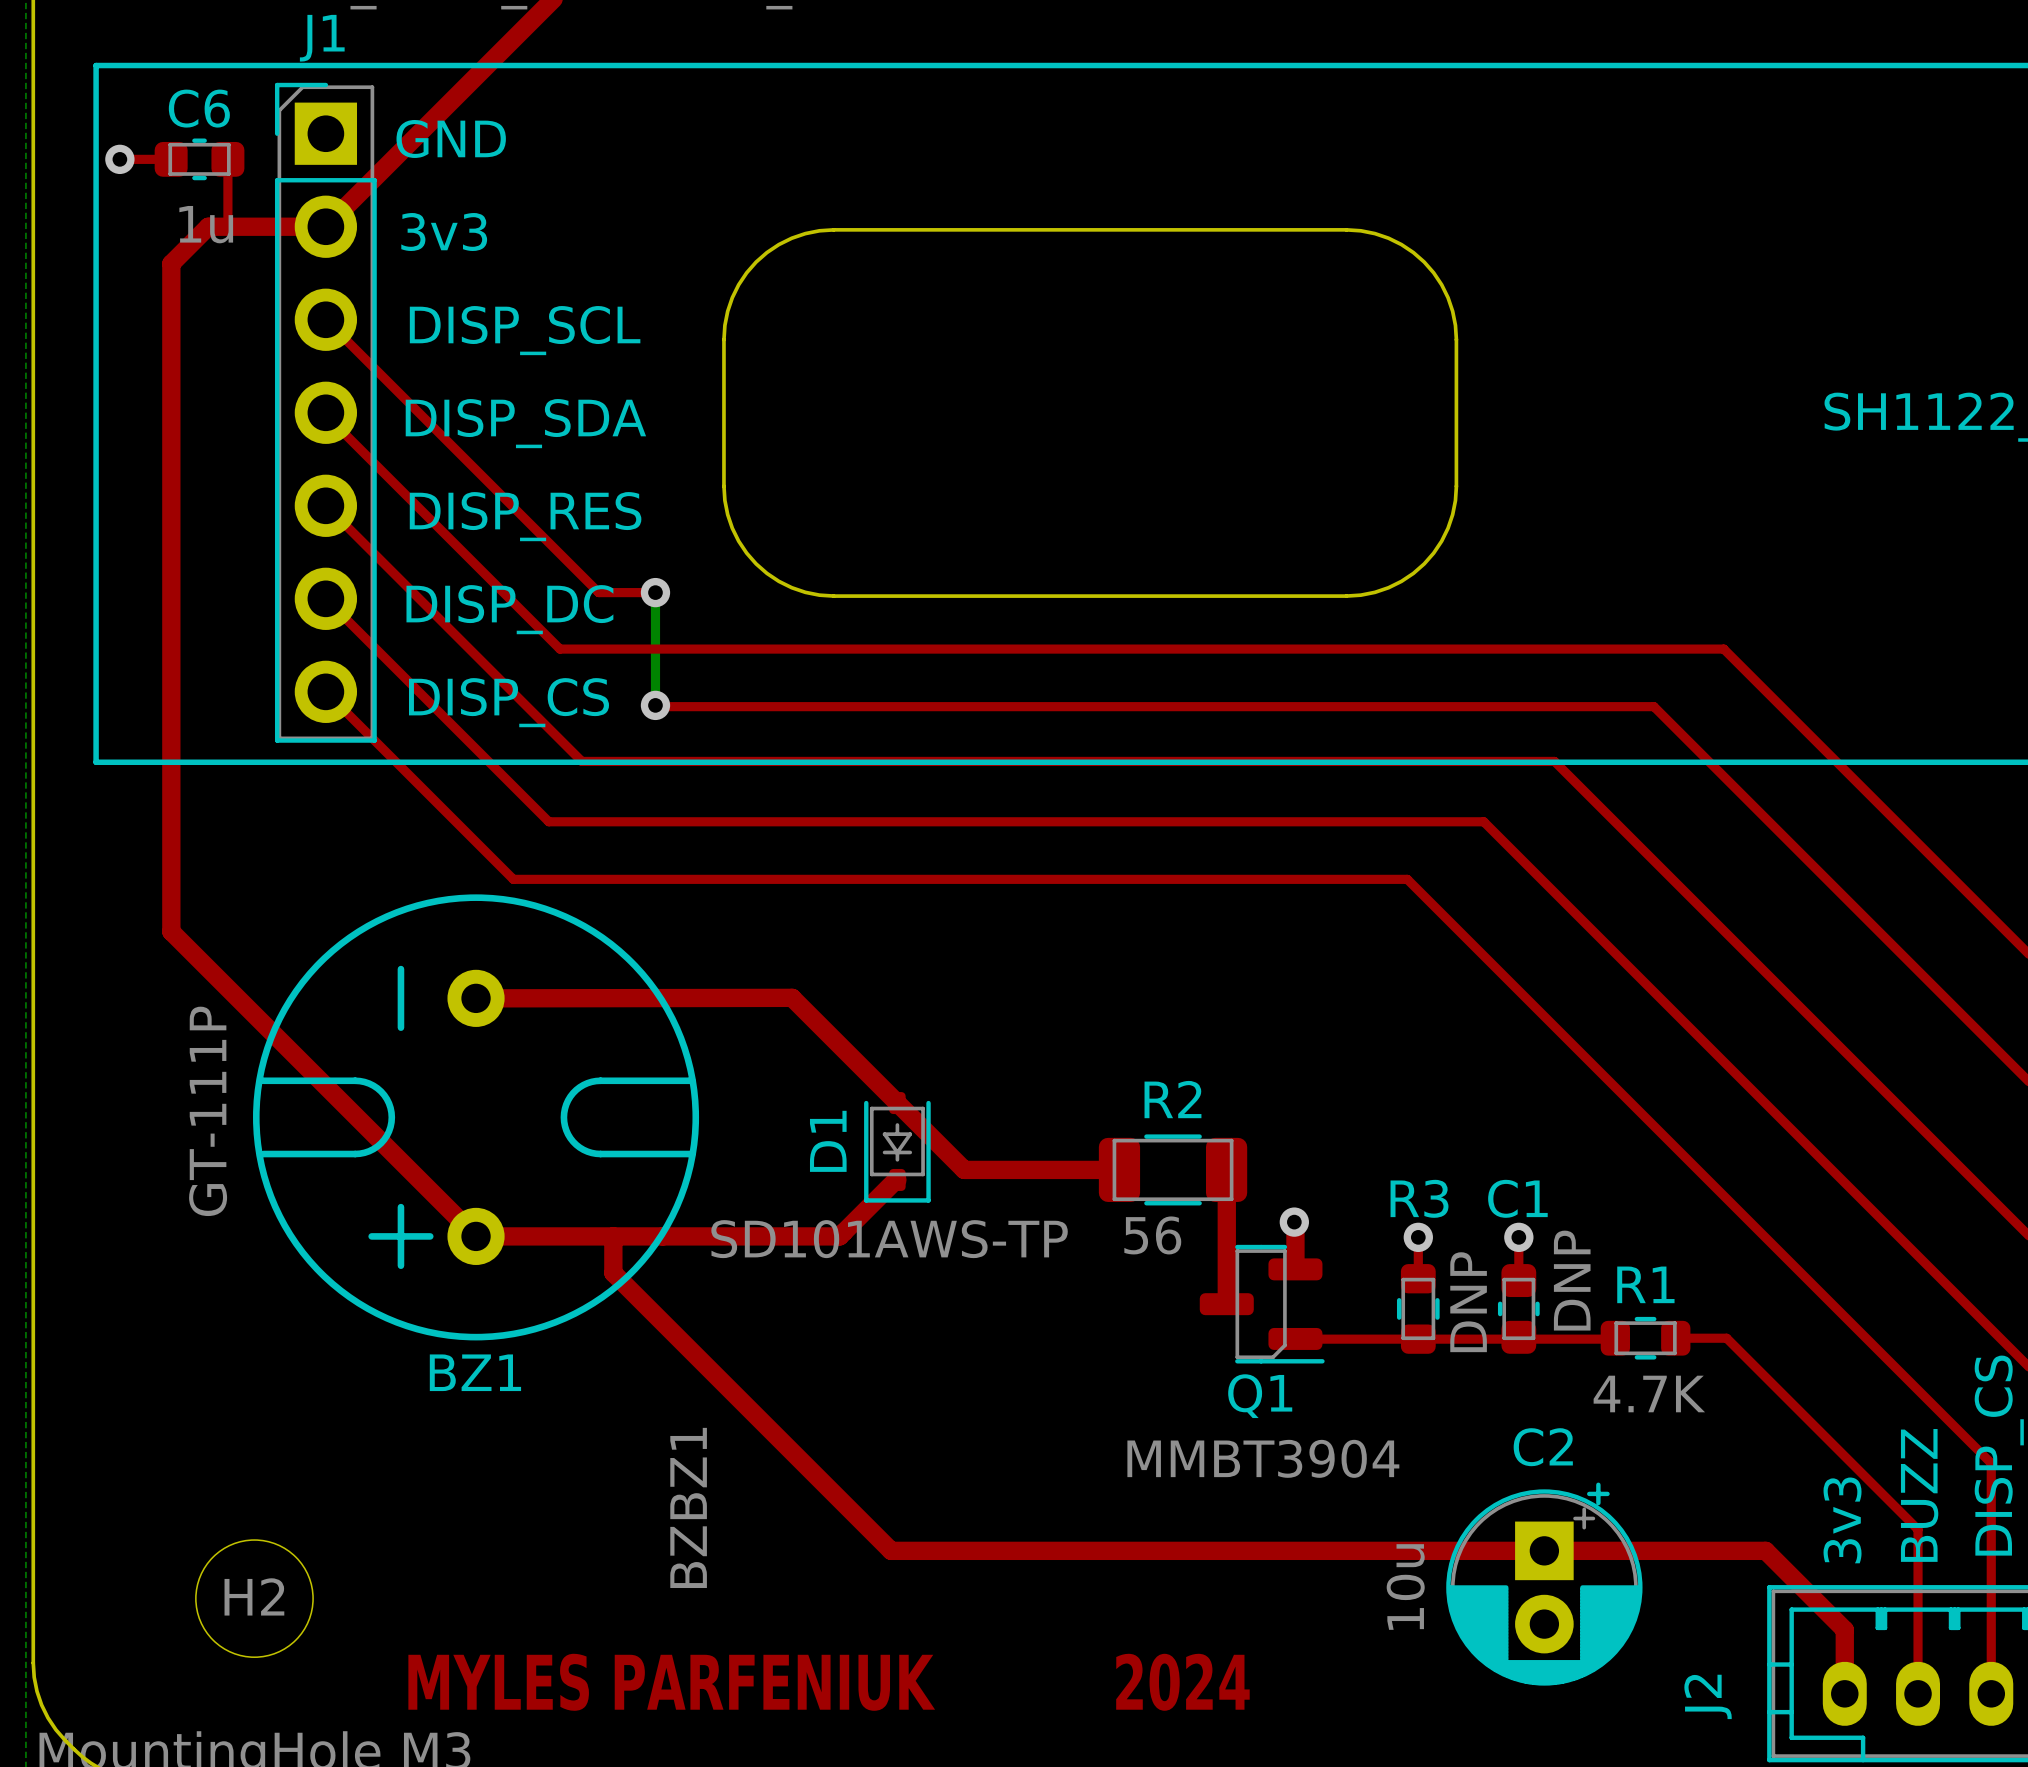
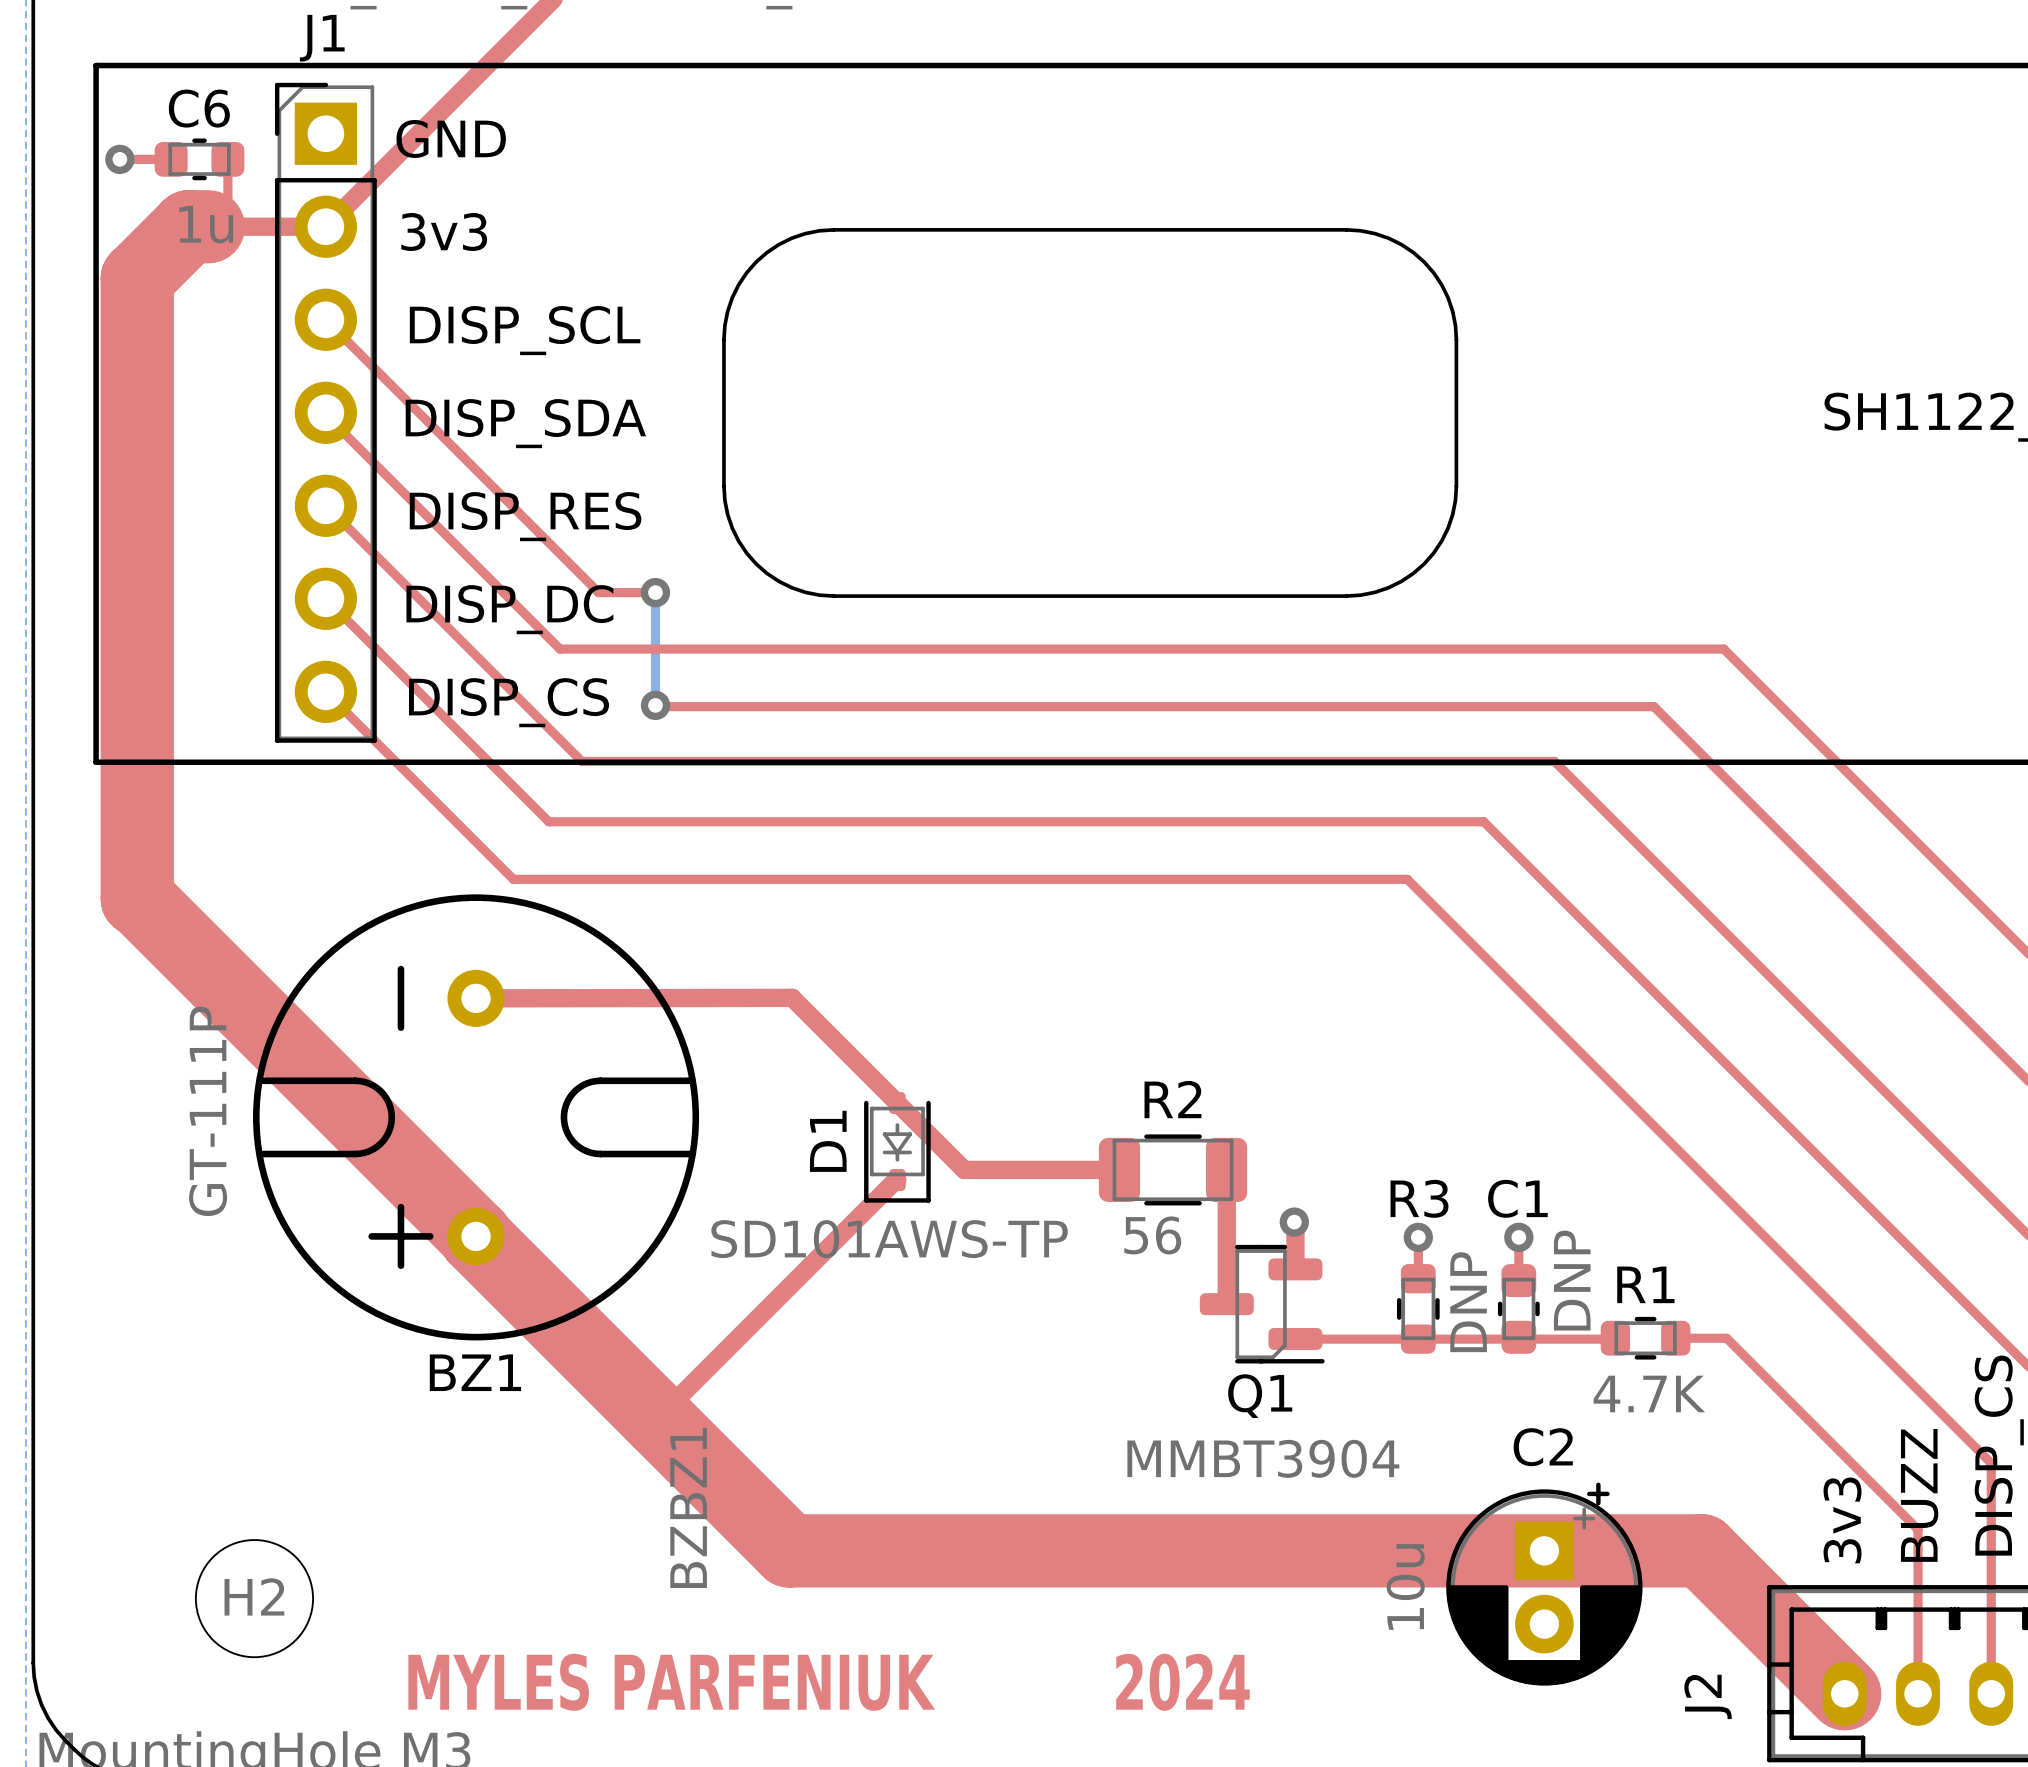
top track: (208, 226) (171, 263) (171, 931) -> (208, 226) (188, 226) (137, 278) (137, 898) (171, 931)
top track width: thin (171, 931) (476, 1236) -> thick (171, 931) (476, 1236)
top track: (476, 1236) (839, 1236) -> (657, 1418) (839, 1236)
top track: (613, 1236) (613, 1273) (891, 1550) -> (476, 1236) (789, 1551) (891, 1550)
top track width: thin (891, 1550) (1701, 1550) -> thick (891, 1550) (1701, 1550)
top track: (1701, 1550) (1765, 1550) (1844, 1629) (1844, 1693) -> (1701, 1550) (1844, 1693)

